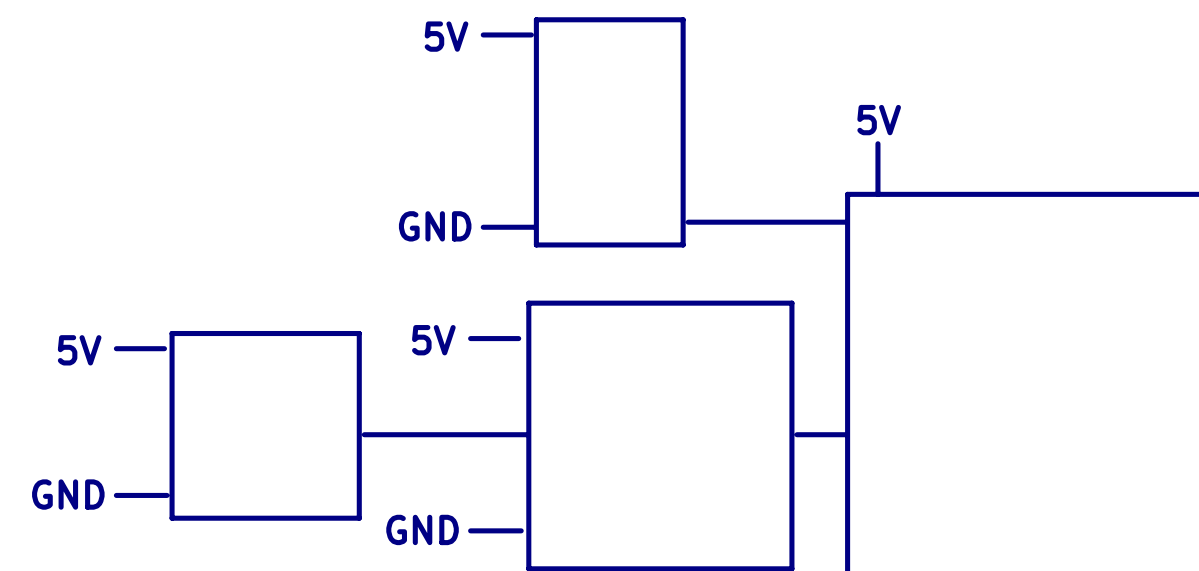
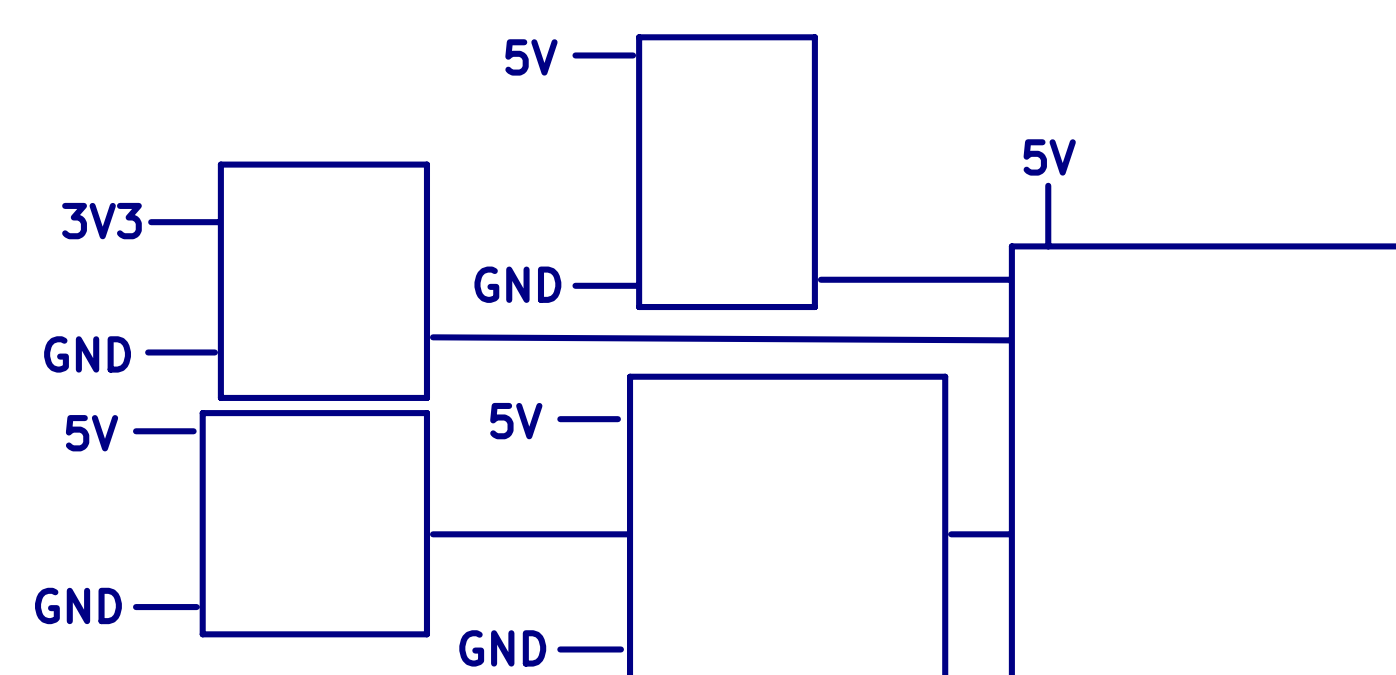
line: none -> (220, 164) (426, 164) (426, 397) (220, 397) (220, 164)
text: none -> 3V3 (101, 221)
line: none -> (151, 222) (217, 222)
line: none -> (433, 337) (1008, 340)
line: none -> (148, 352) (214, 352)
text: none -> GND (87, 354)

